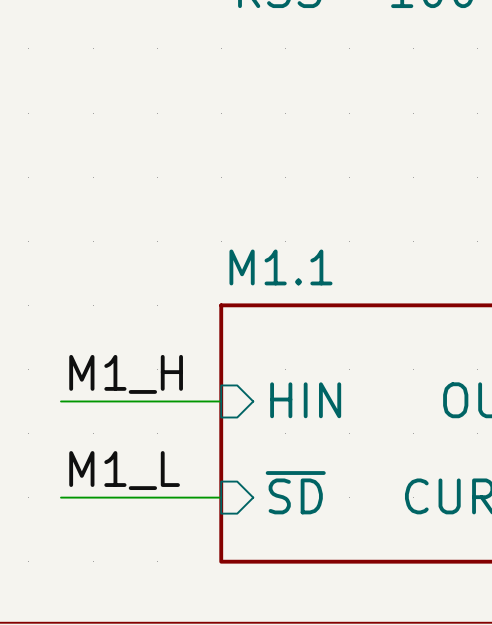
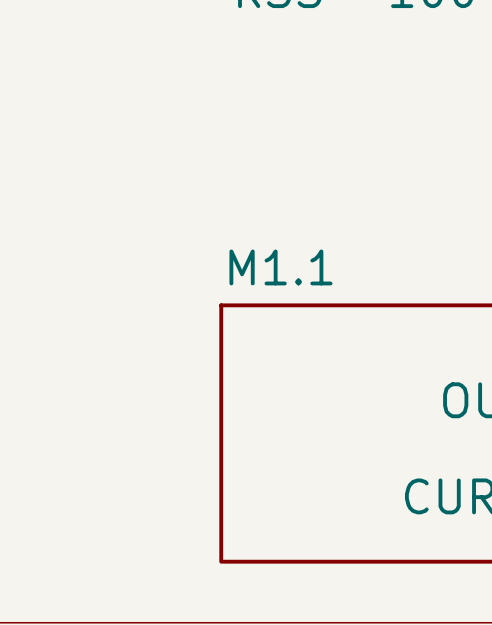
label: M1_H (126, 374) -> none
sheet pin: HIN (305, 400) -> none
wire: (61, 401) (221, 401) -> none
label: M1_L (124, 470) -> none
sheet pin: ~{SD} (295, 492) -> none
wire: (61, 497) (221, 497) -> none

